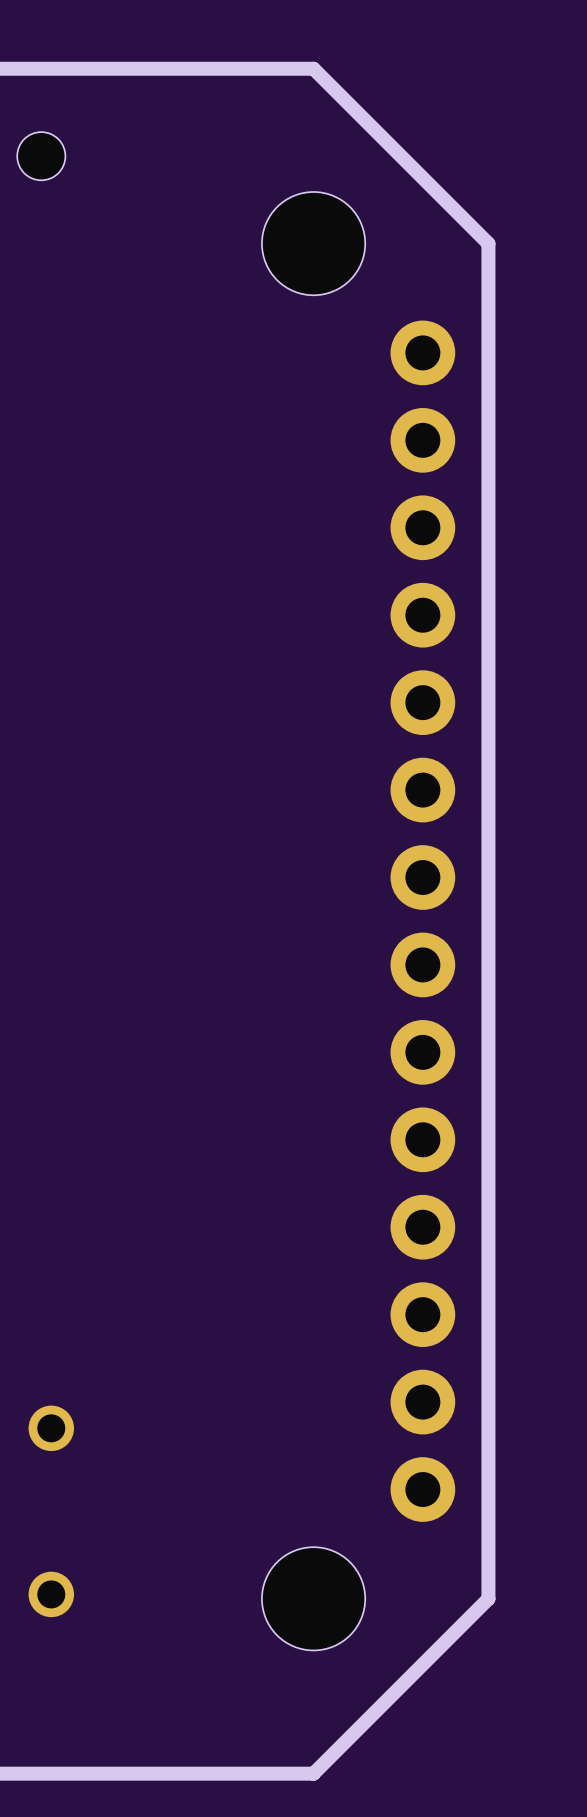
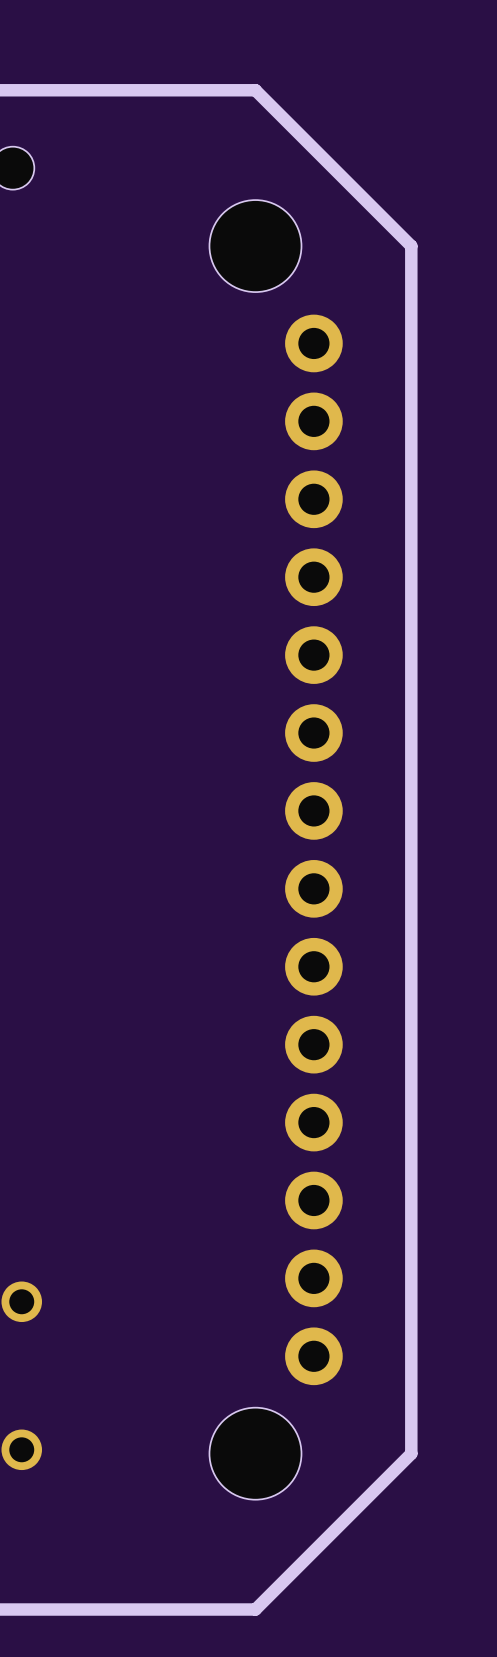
part position: (422, 921) -> (313, 849)

